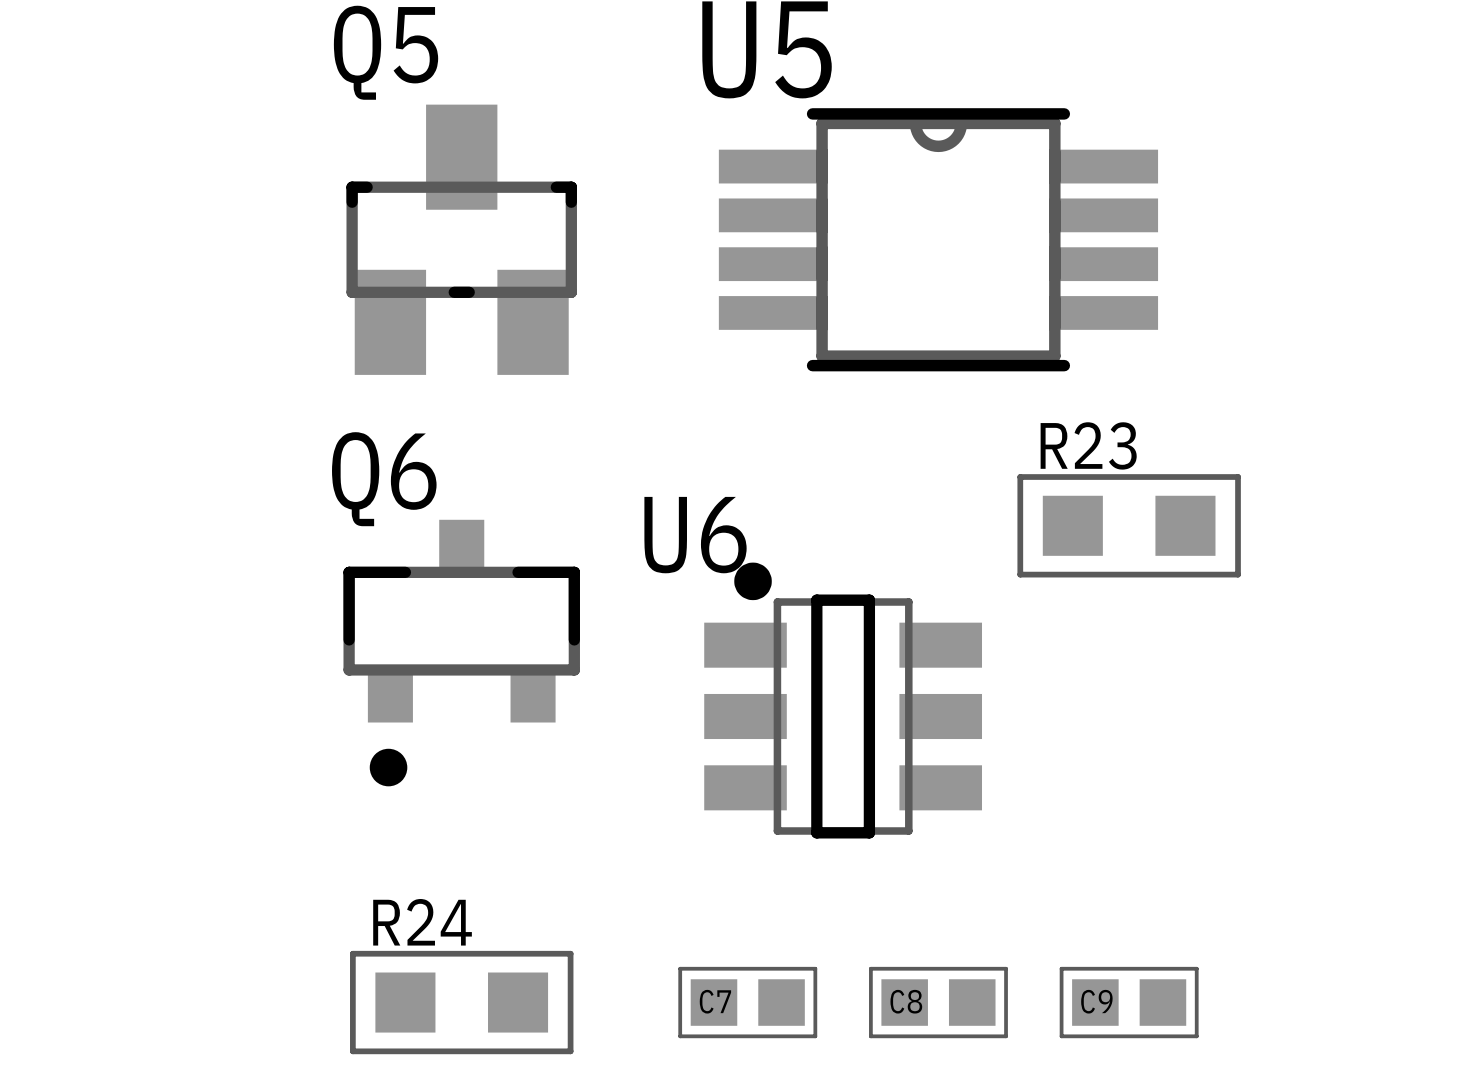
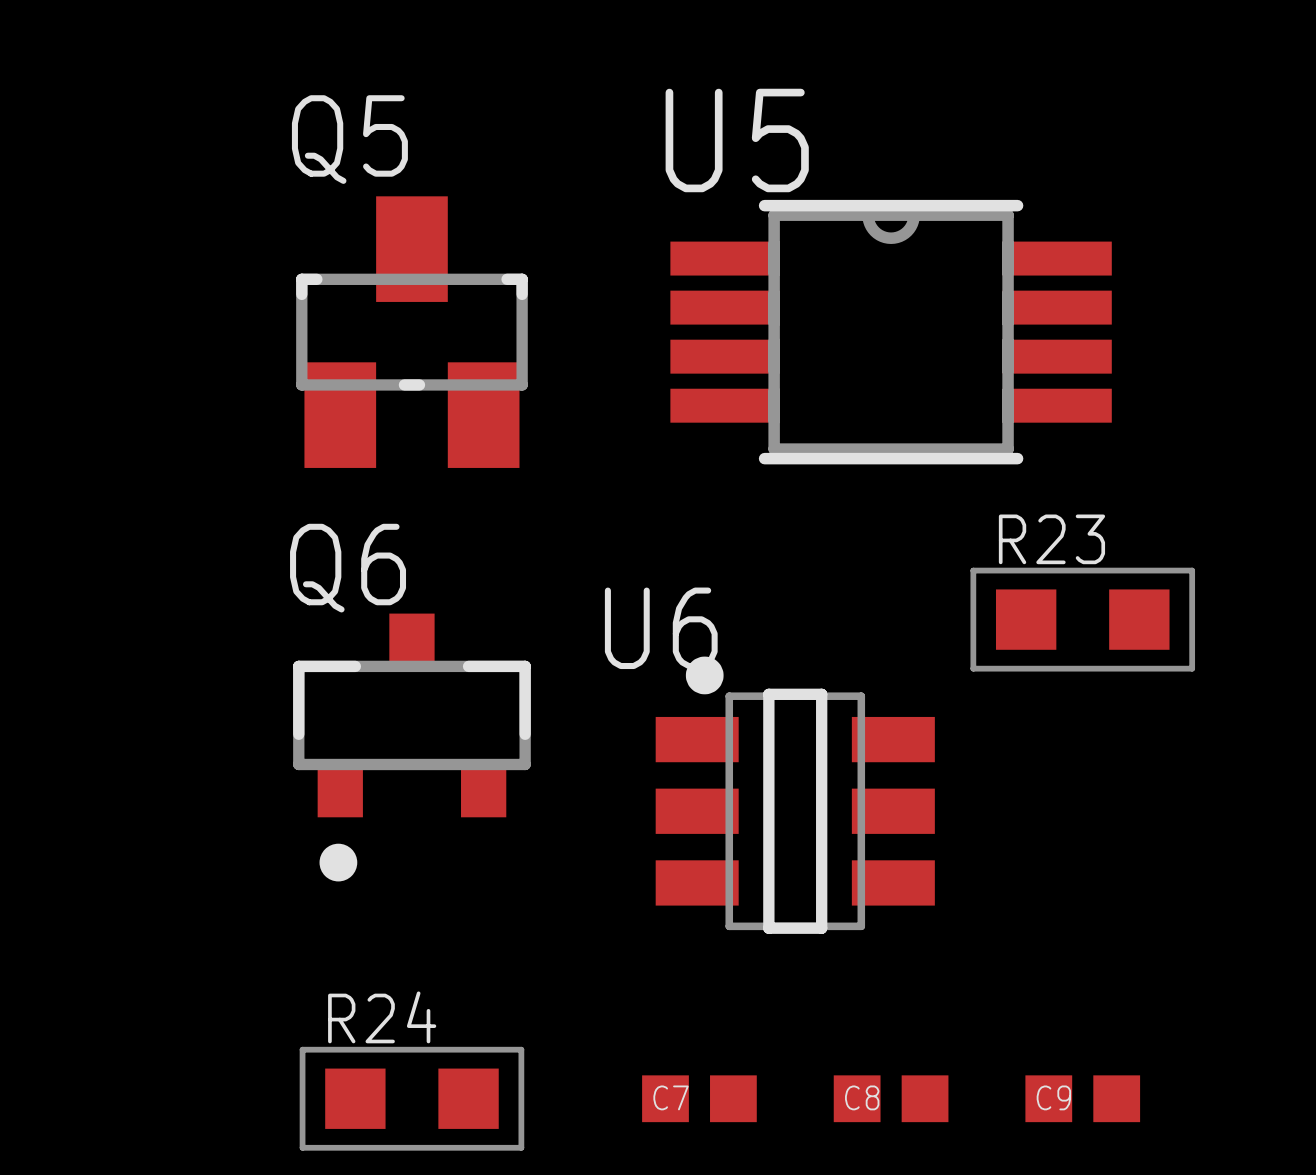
C7 footprint: [678, 966, 818, 1039] -> [642, 1075, 757, 1123]
C8 footprint: [869, 966, 1008, 1039] -> [833, 1075, 949, 1123]
C9 footprint: [1059, 966, 1199, 1039] -> [1025, 1075, 1141, 1123]

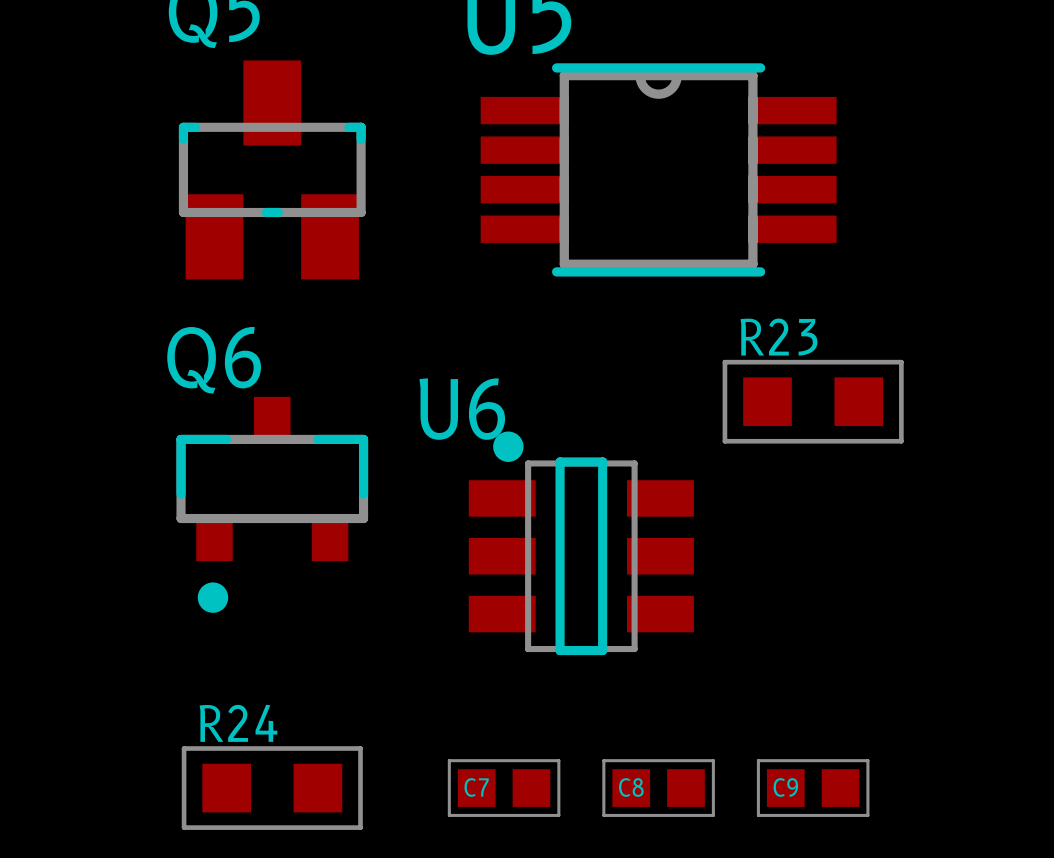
C7 footprint: [642, 1075, 757, 1123] -> [447, 759, 561, 817]
C8 footprint: [833, 1075, 949, 1123] -> [602, 759, 715, 817]
C9 footprint: [1025, 1075, 1141, 1123] -> [756, 759, 870, 817]

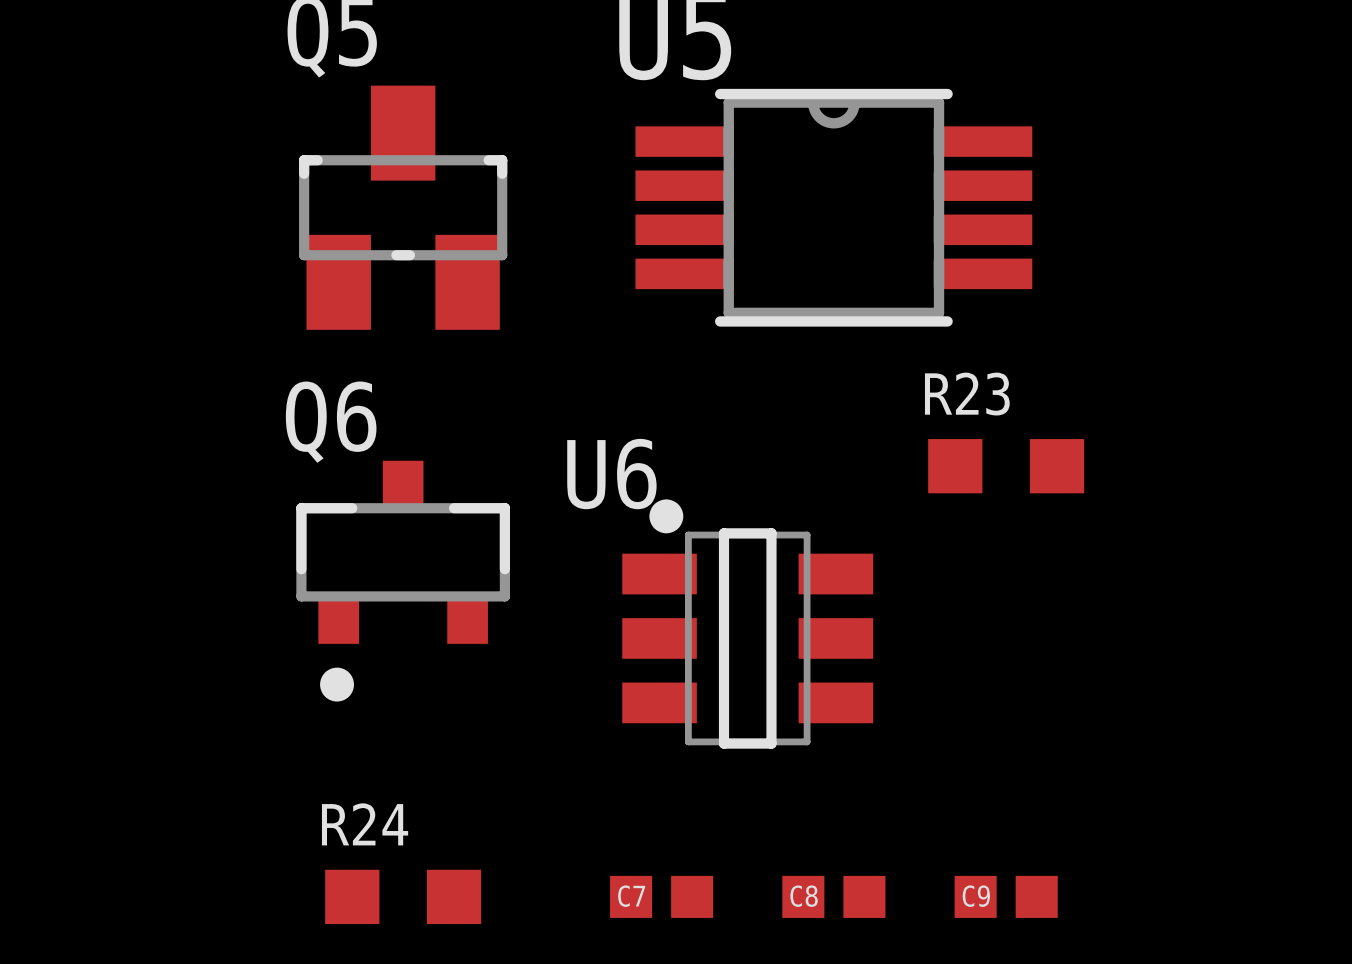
R23 footprint: [722, 359, 904, 444] -> [928, 439, 1085, 494]
R24 footprint: [181, 746, 363, 830] -> [325, 869, 482, 925]
C7 footprint: [447, 759, 561, 817] -> [610, 875, 714, 918]
C8 footprint: [602, 759, 715, 817] -> [782, 875, 886, 918]
C9 footprint: [756, 759, 870, 817] -> [954, 875, 1058, 918]

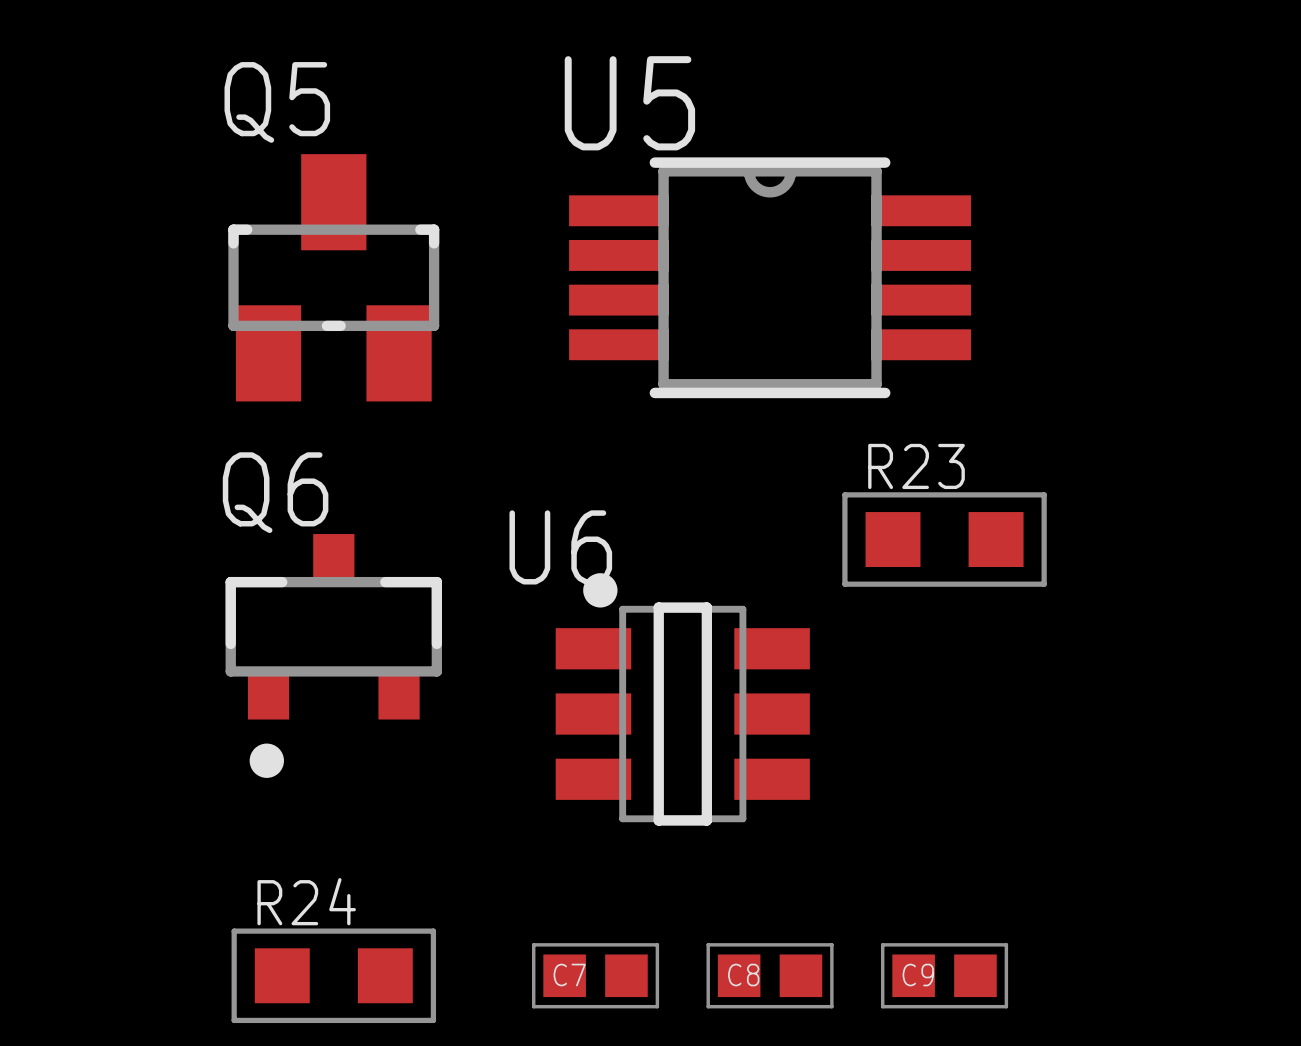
R23 footprint: [928, 439, 1085, 494] -> [842, 492, 1047, 587]
R24 footprint: [325, 869, 482, 925] -> [231, 928, 437, 1024]
C7 footprint: [610, 875, 714, 918] -> [531, 943, 660, 1009]
C8 footprint: [782, 875, 886, 918] -> [706, 943, 834, 1009]
C9 footprint: [954, 875, 1058, 918] -> [880, 943, 1009, 1009]

